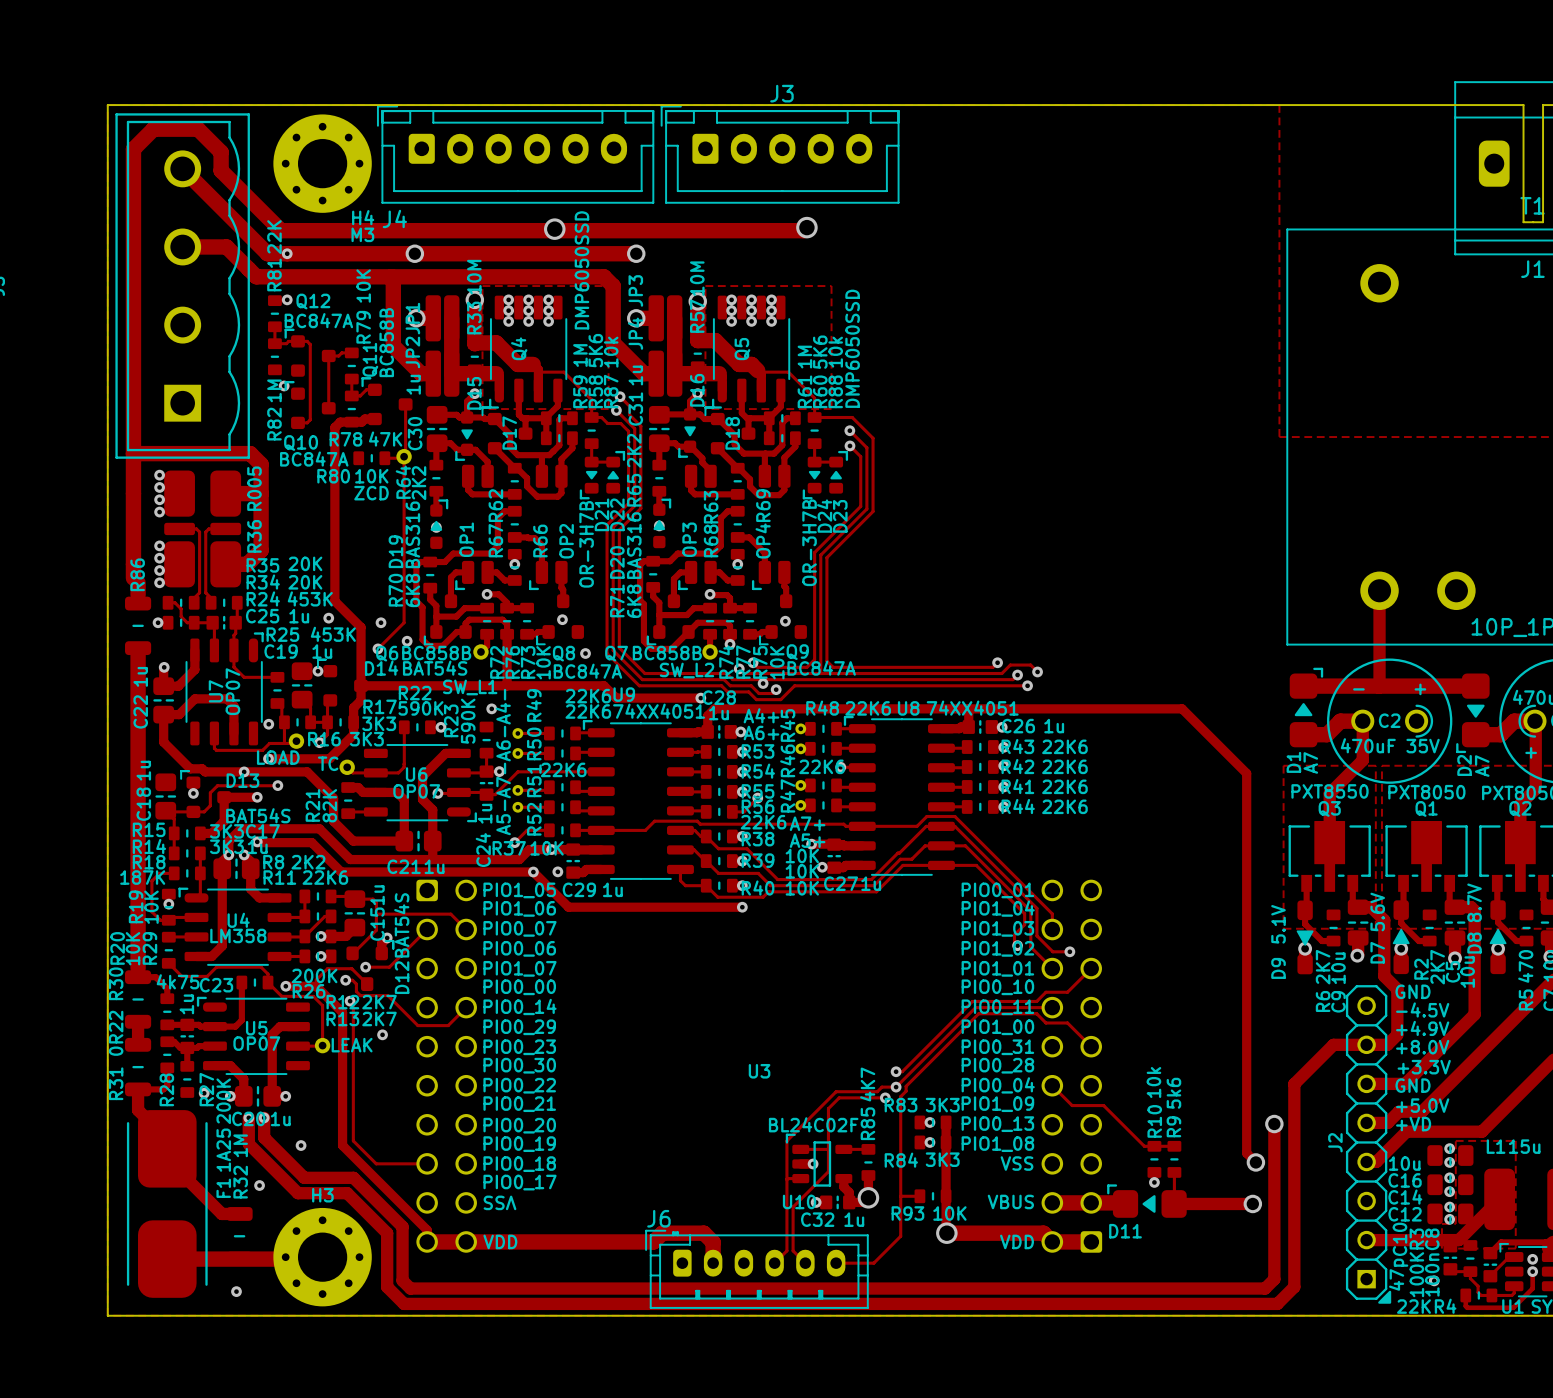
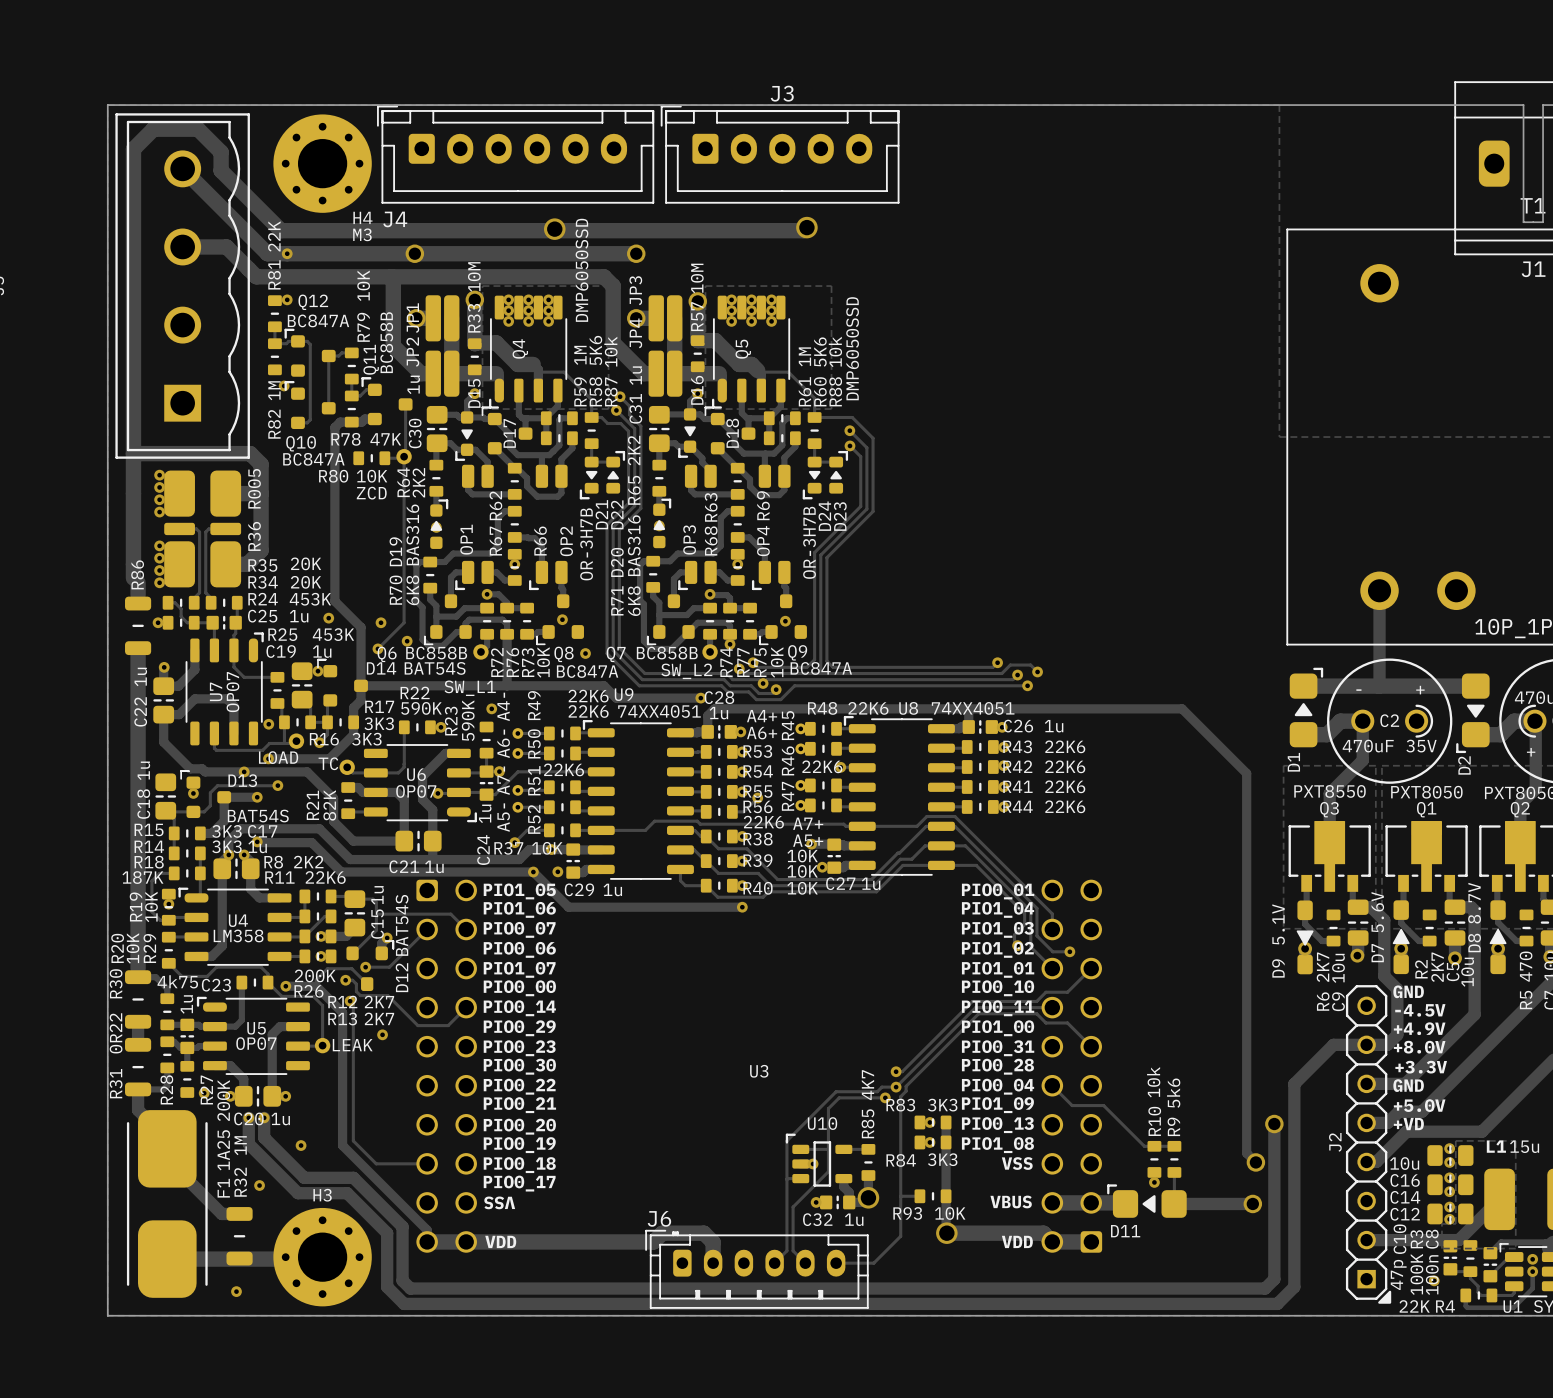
D1 value: A7 (1310, 762) -> none
D2 value: A7 (1482, 766) -> none
U10 value: BL24C02F (813, 1124) -> none
U10 name position: U10 (799, 1201) -> U10 (822, 1123)

